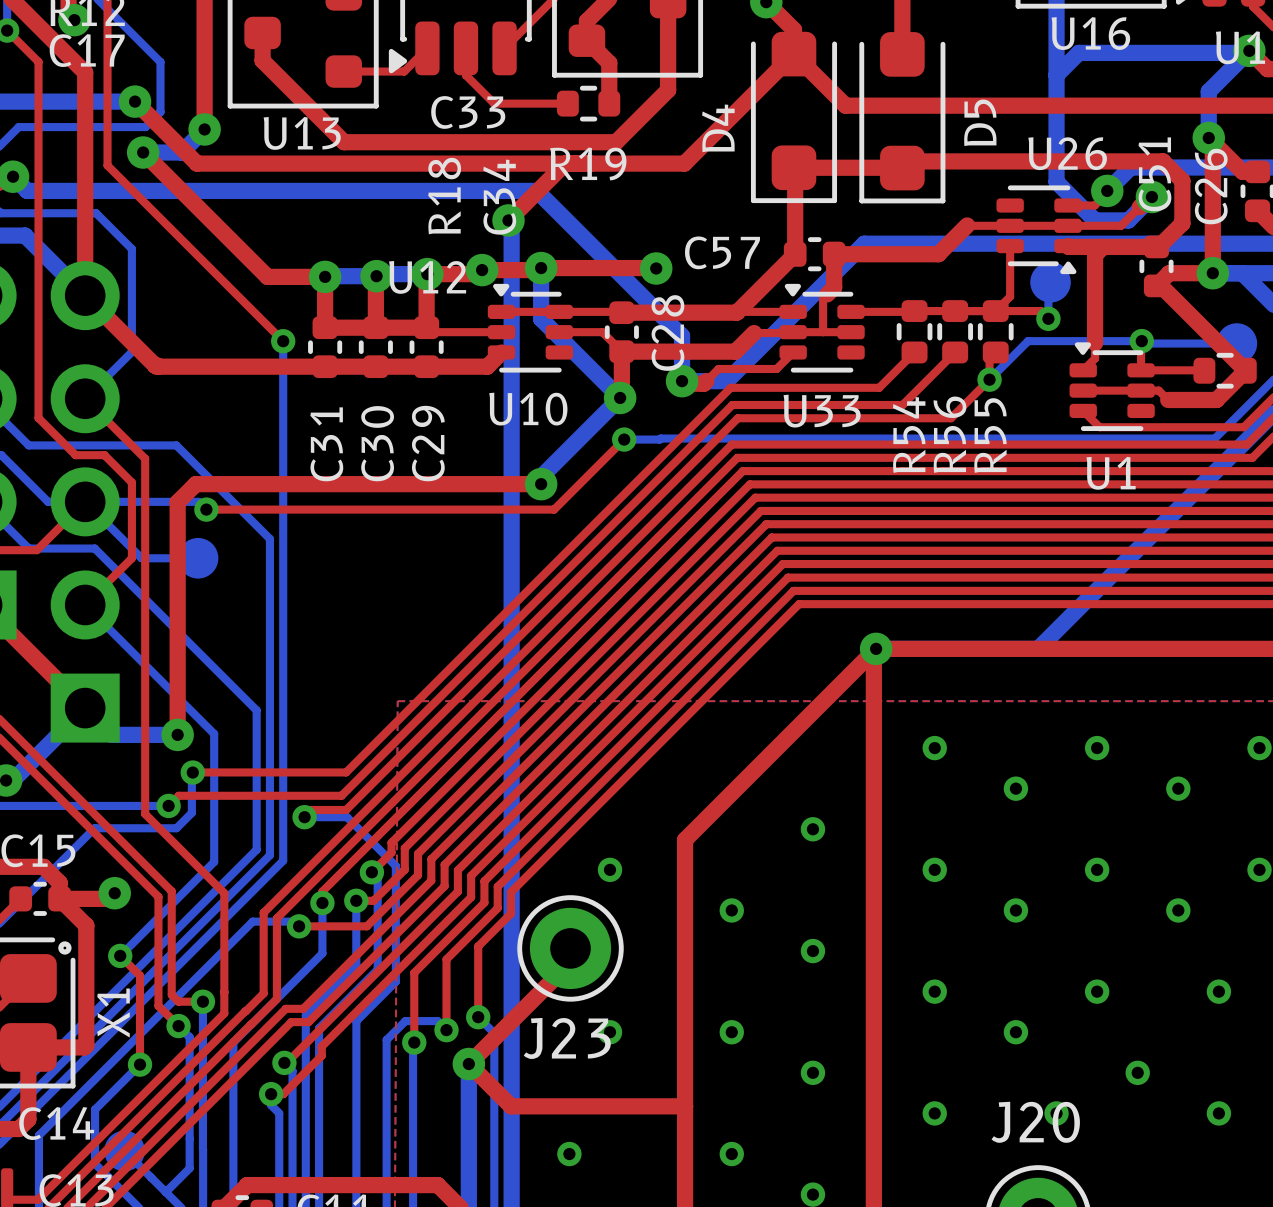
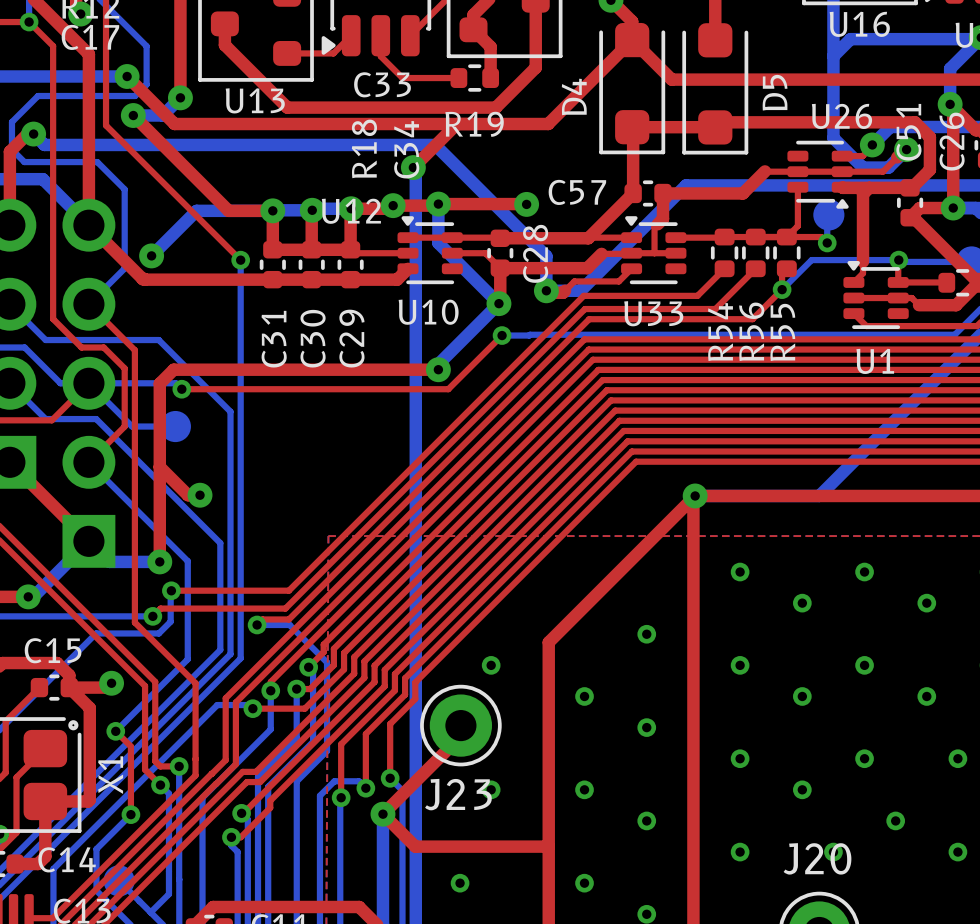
bottom track: none -> (272, 210) (196, 210) (151, 255)
via: none -> (151, 255)
top track: none -> (159, 467) (188, 495) (200, 495)
via: none -> (200, 495)

